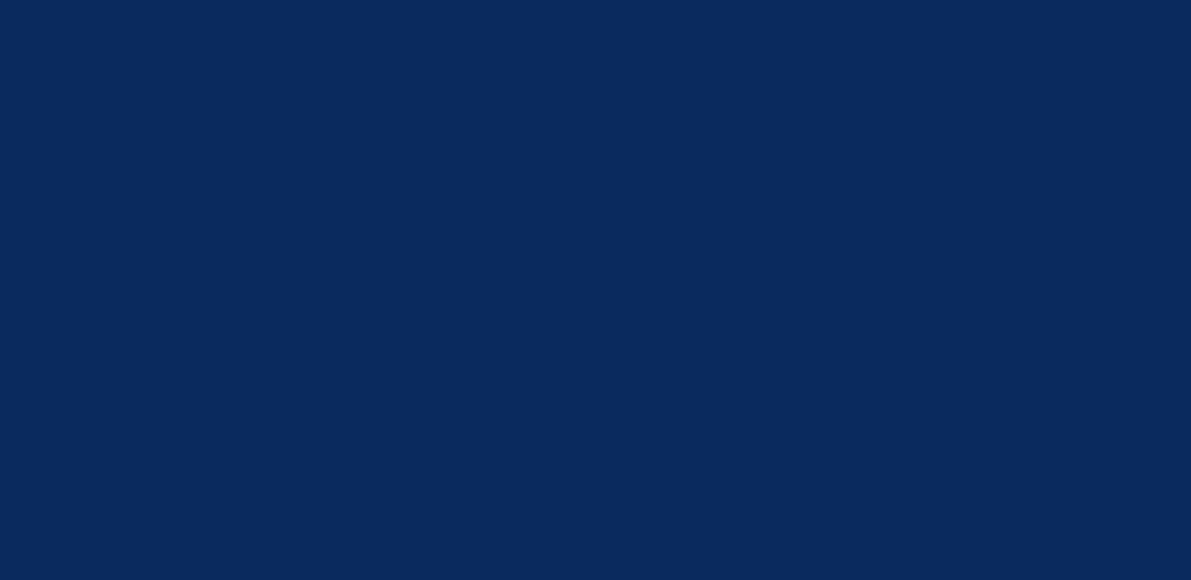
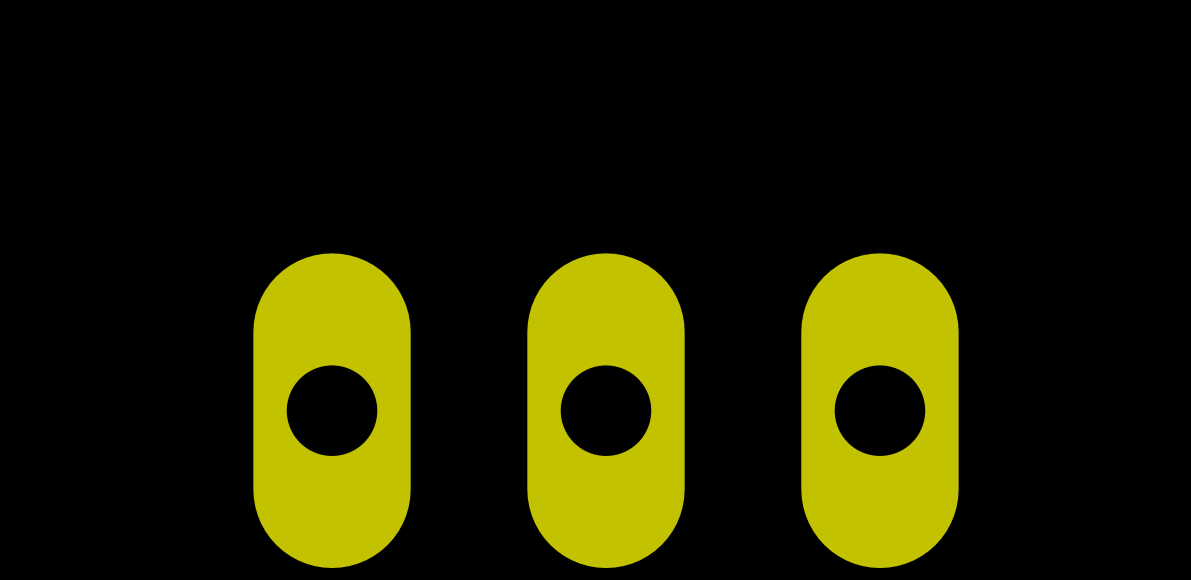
part: none -> (605, 410)

